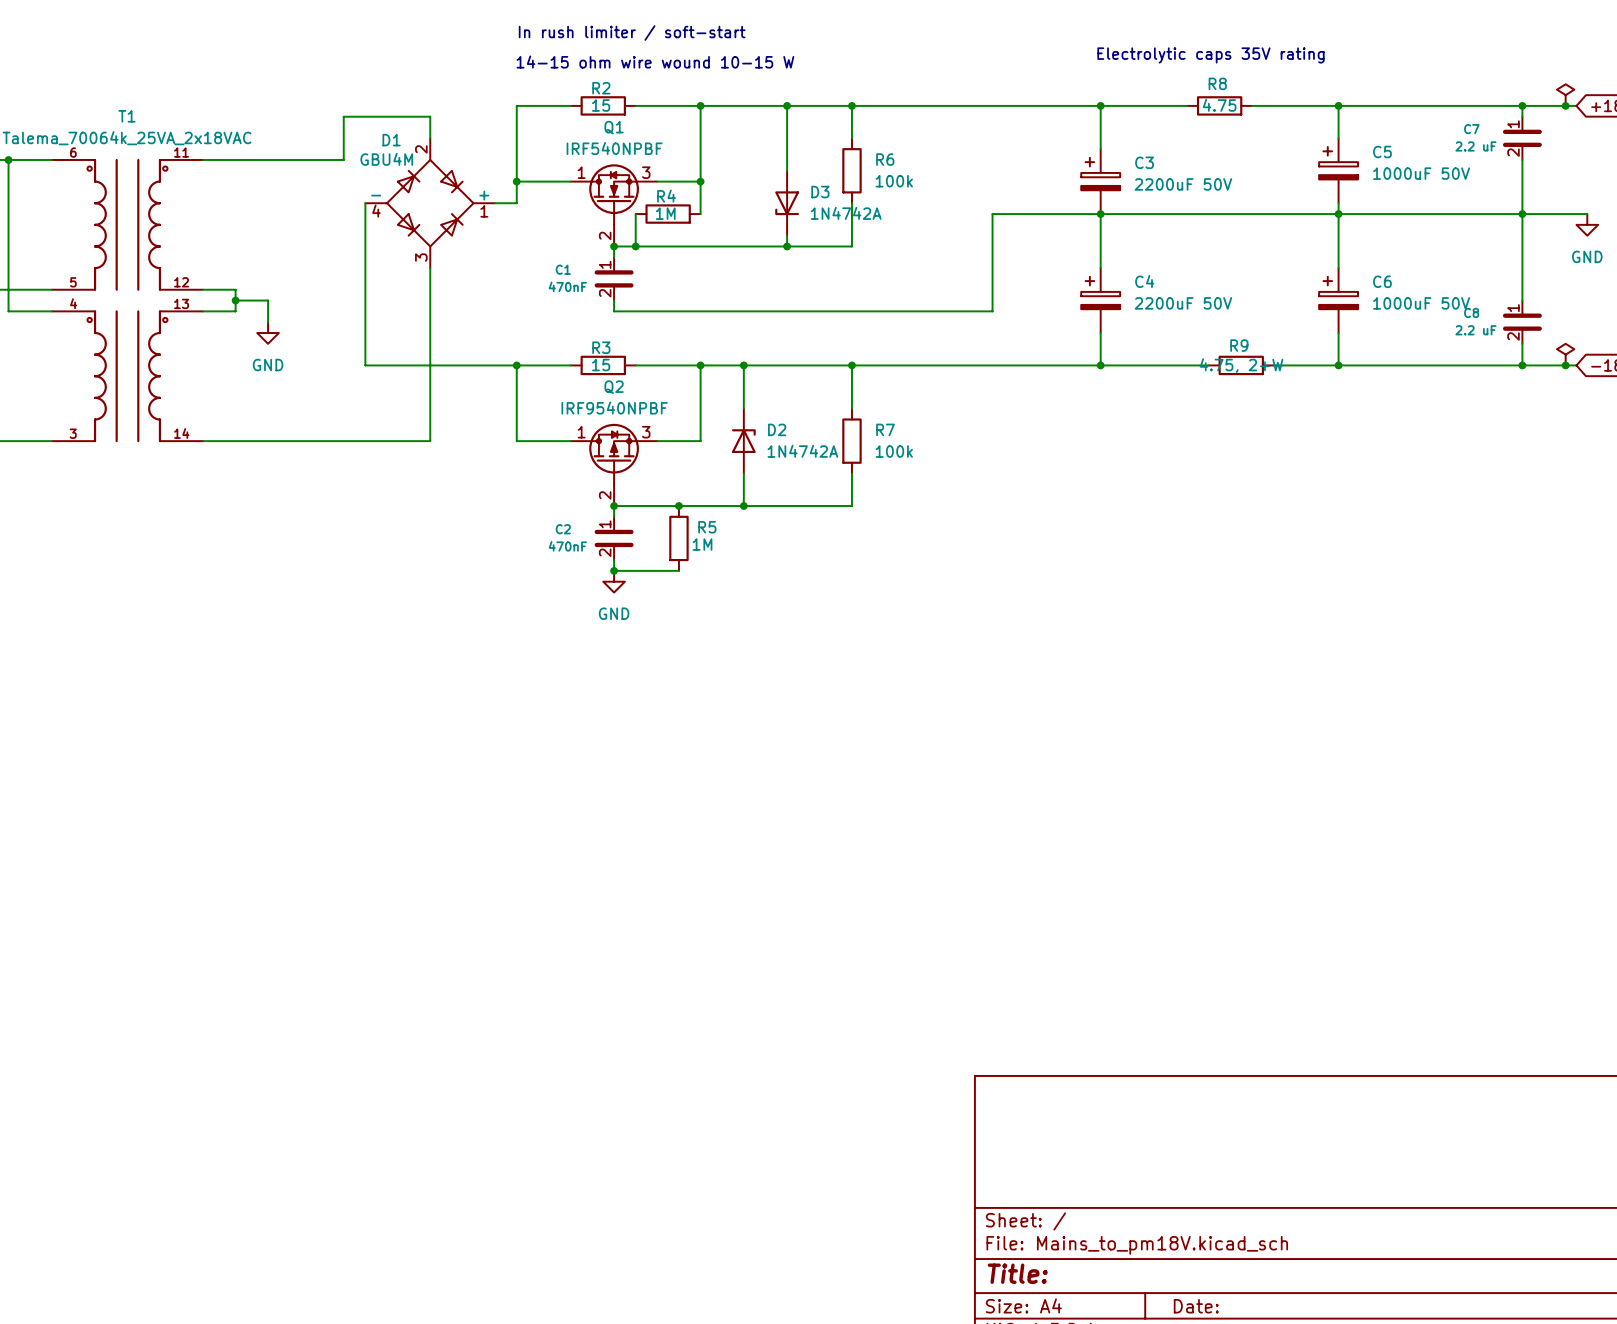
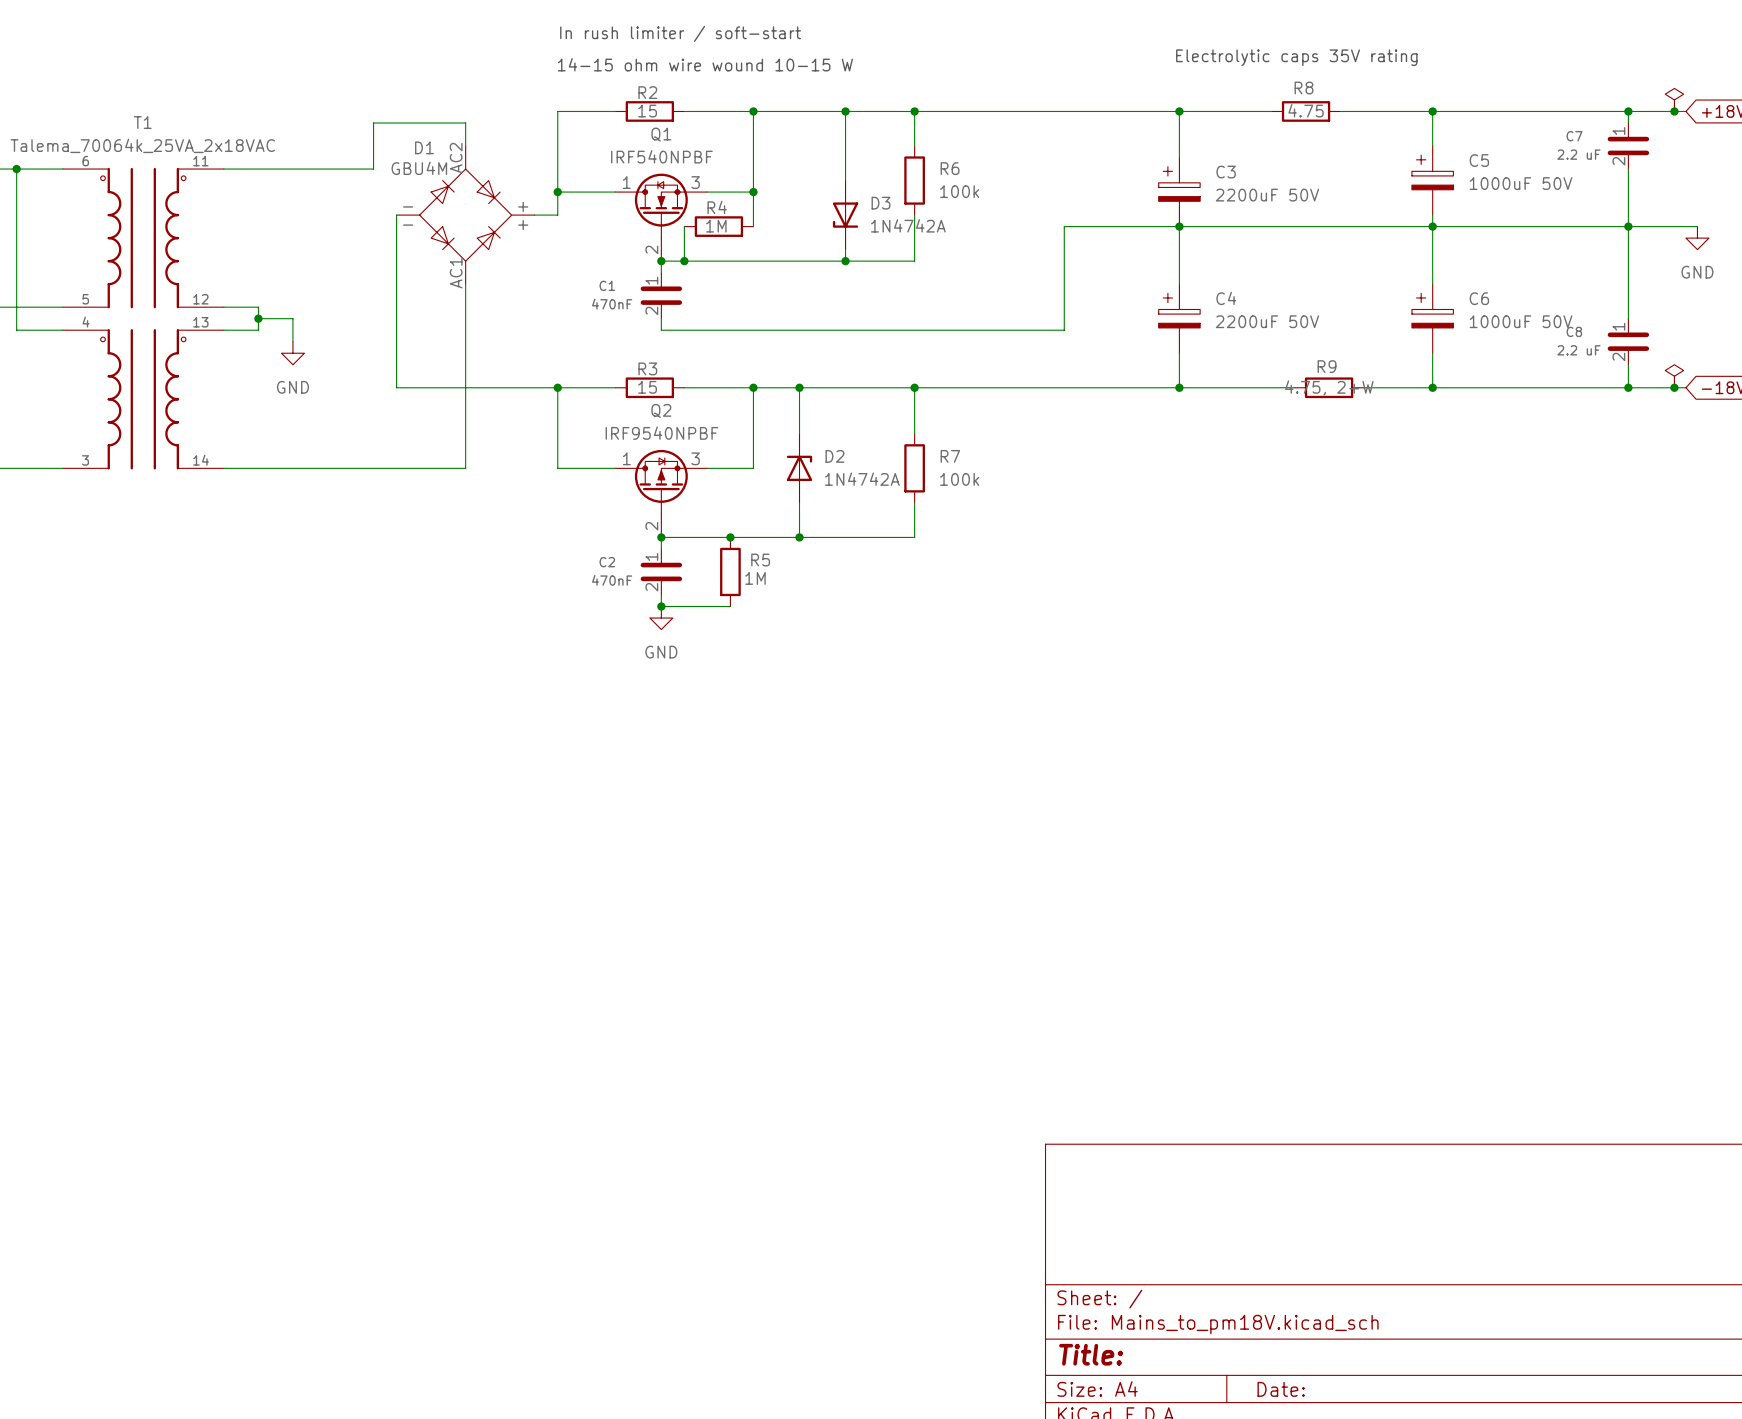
D1 pin number: 2 (421, 149) -> AC2 (456, 158)
D1 pin number: 4 (376, 211) -> - (408, 225)
D1 pin number: 1 (484, 211) -> + (523, 225)
D1 pin number: 3 (421, 257) -> AC1 (456, 273)

